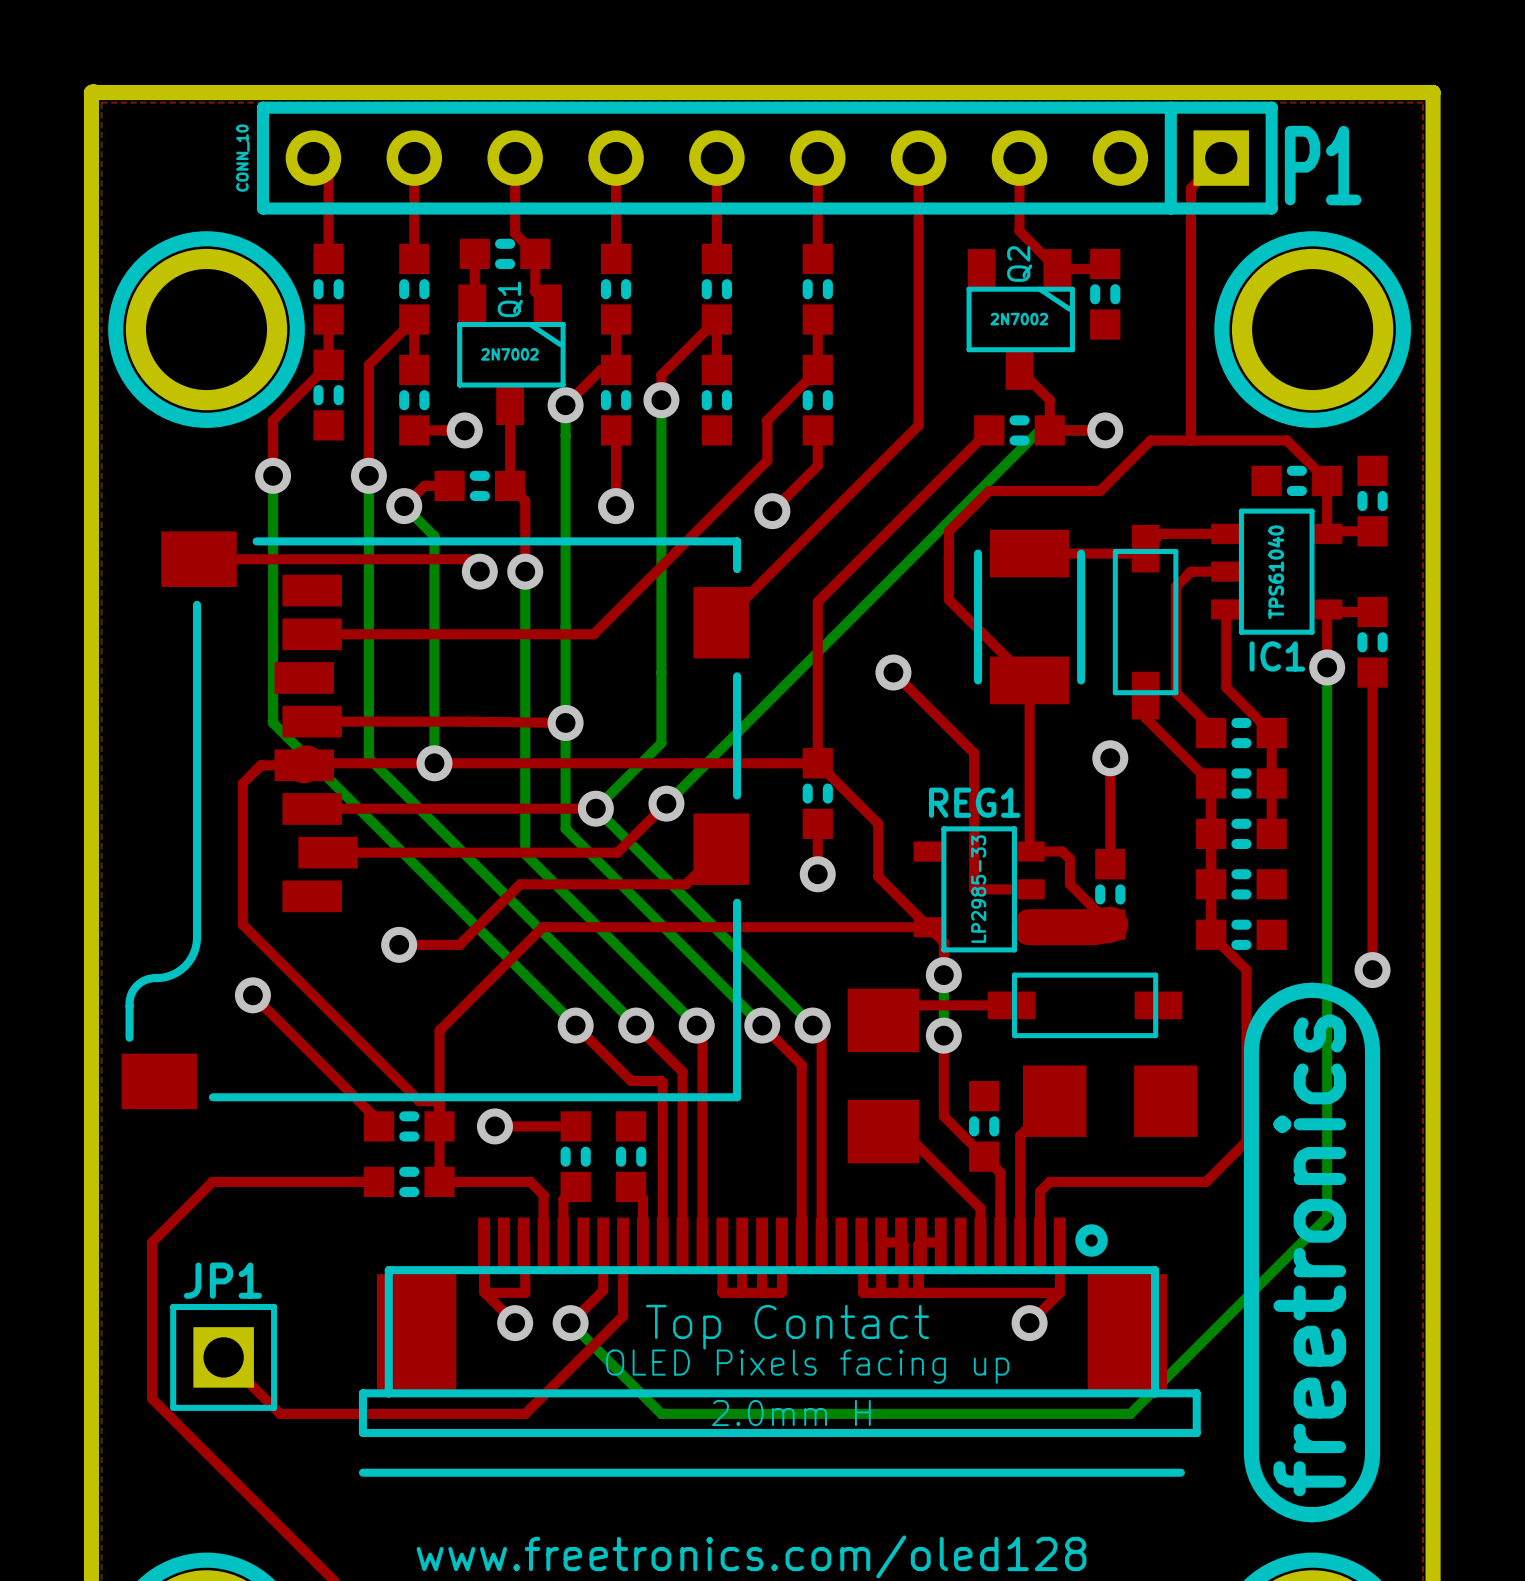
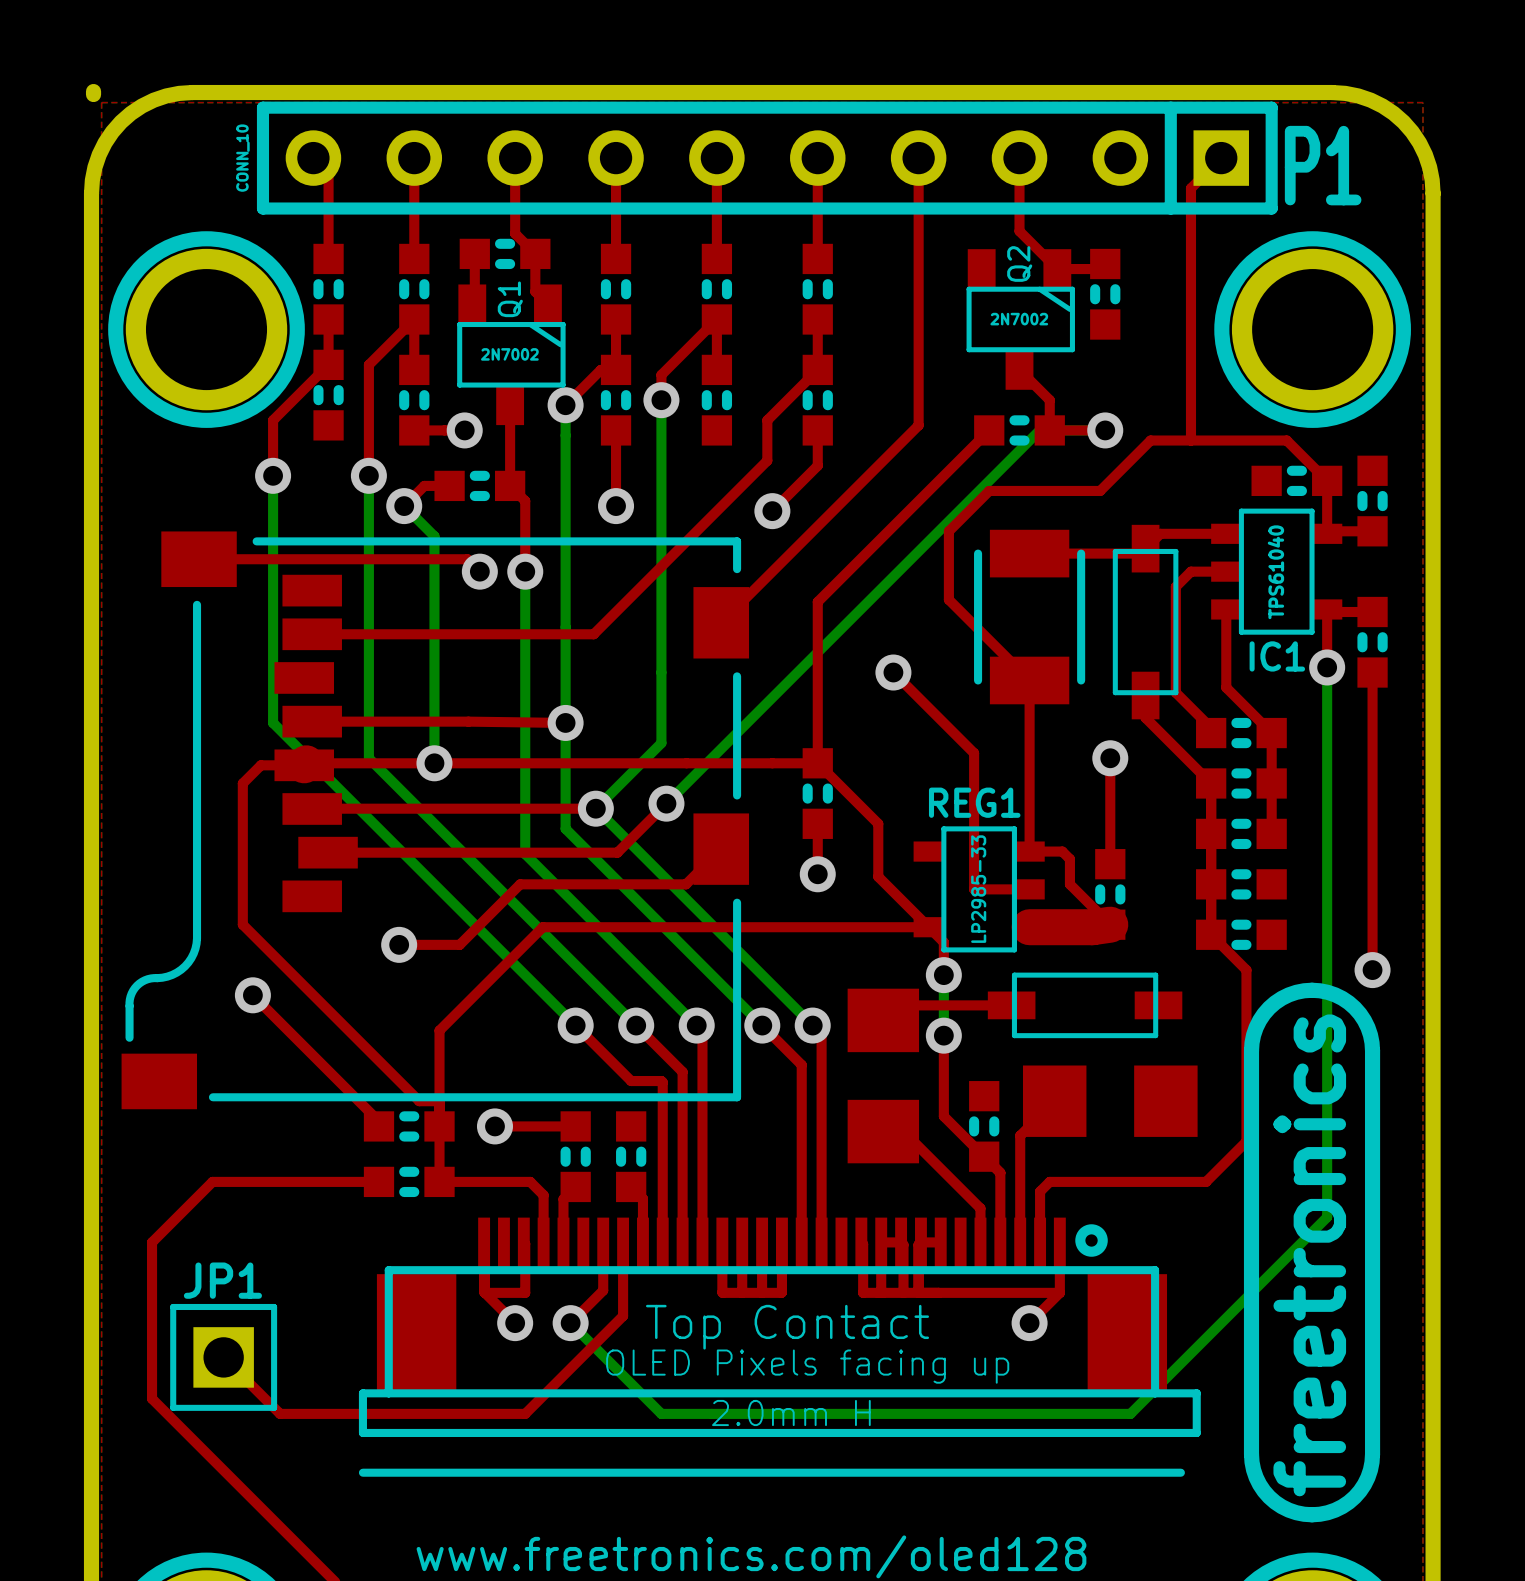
board edge: (192, 92) (91, 92) (91, 193) -> (192, 92) (179, 93) (153, 100) (130, 113) (121, 122) (112, 131) (99, 154) (92, 180) (91, 193)
board edge: (1332, 92) (1433, 92) (1433, 193) -> (1332, 92) (1345, 93) (1370, 100) (1393, 113) (1403, 122) (1412, 131) (1425, 154) (1432, 180) (1433, 193)

